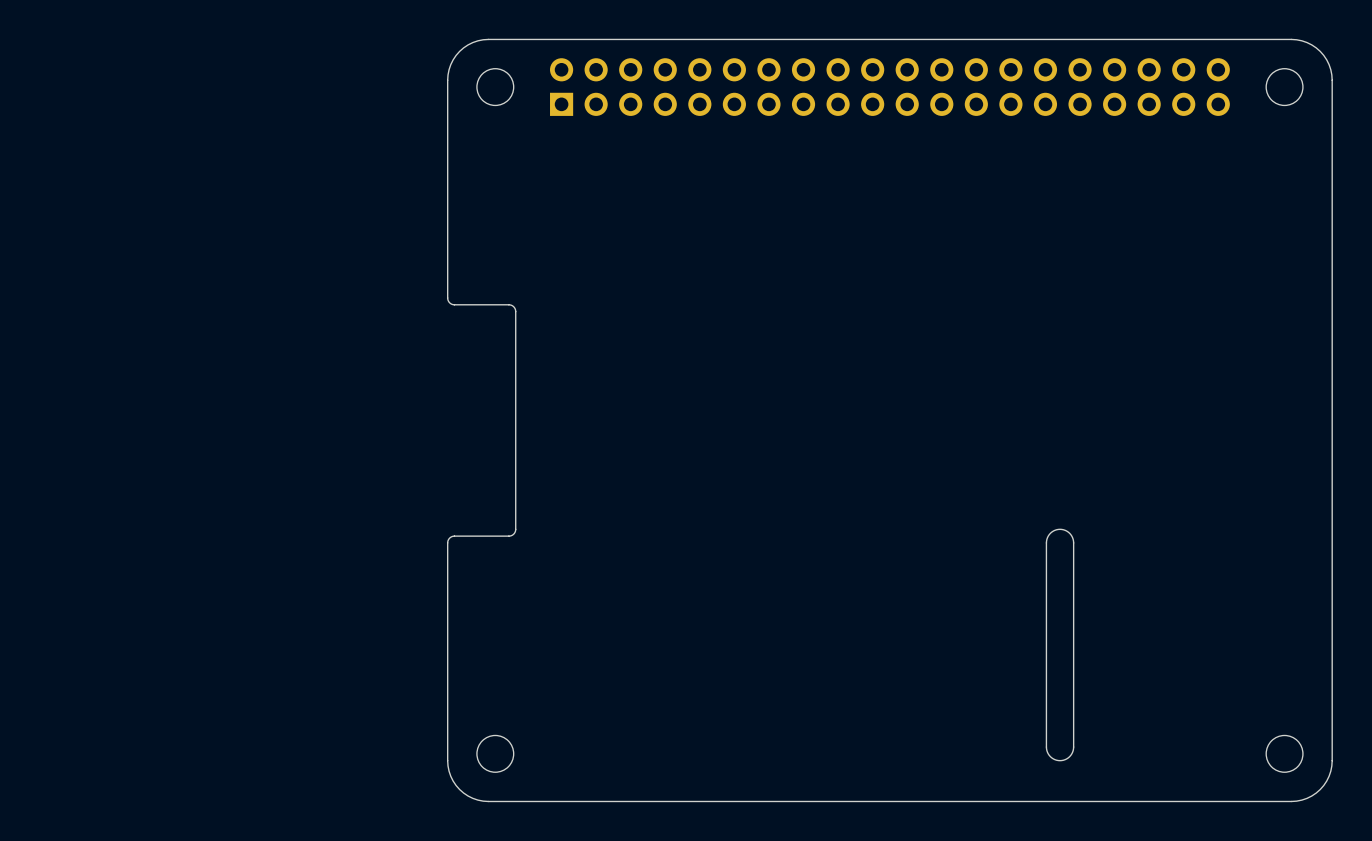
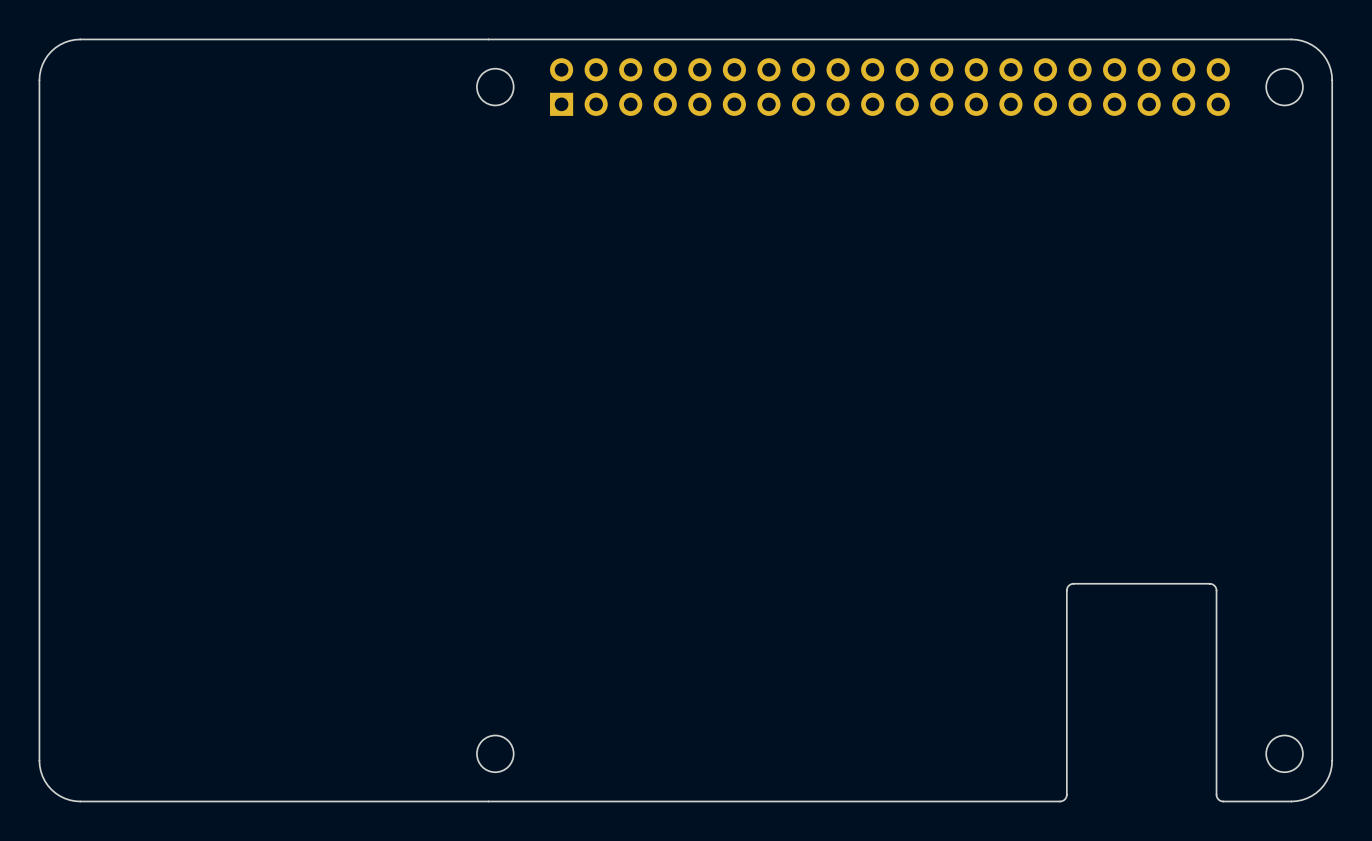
board edge: (488, 39) (472, 42) (459, 51) (450, 64) (447, 80) (447, 299) (453, 304) (509, 304) (514, 307) (515, 311) (515, 531) (509, 536) (453, 536) (449, 538) (447, 542) (448, 765) (453, 781) (463, 793) (477, 800) (488, 801) -> (488, 39) (74, 39) (59, 44) (47, 55) (40, 69) (39, 80) (39, 760) (44, 781) (59, 796) (80, 801) (488, 801)
board edge: (1046, 542) (1046, 748) (1051, 757) (1061, 760) (1070, 755) (1073, 747) (1073, 541) (1069, 533) (1060, 529) (1050, 533) (1046, 542) -> none
board edge: (1060, 801) (1223, 801) -> (1060, 801) (1064, 799) (1066, 794) (1066, 590) (1068, 585) (1073, 583) (1209, 583) (1215, 586) (1216, 794) (1218, 799) (1223, 801)

